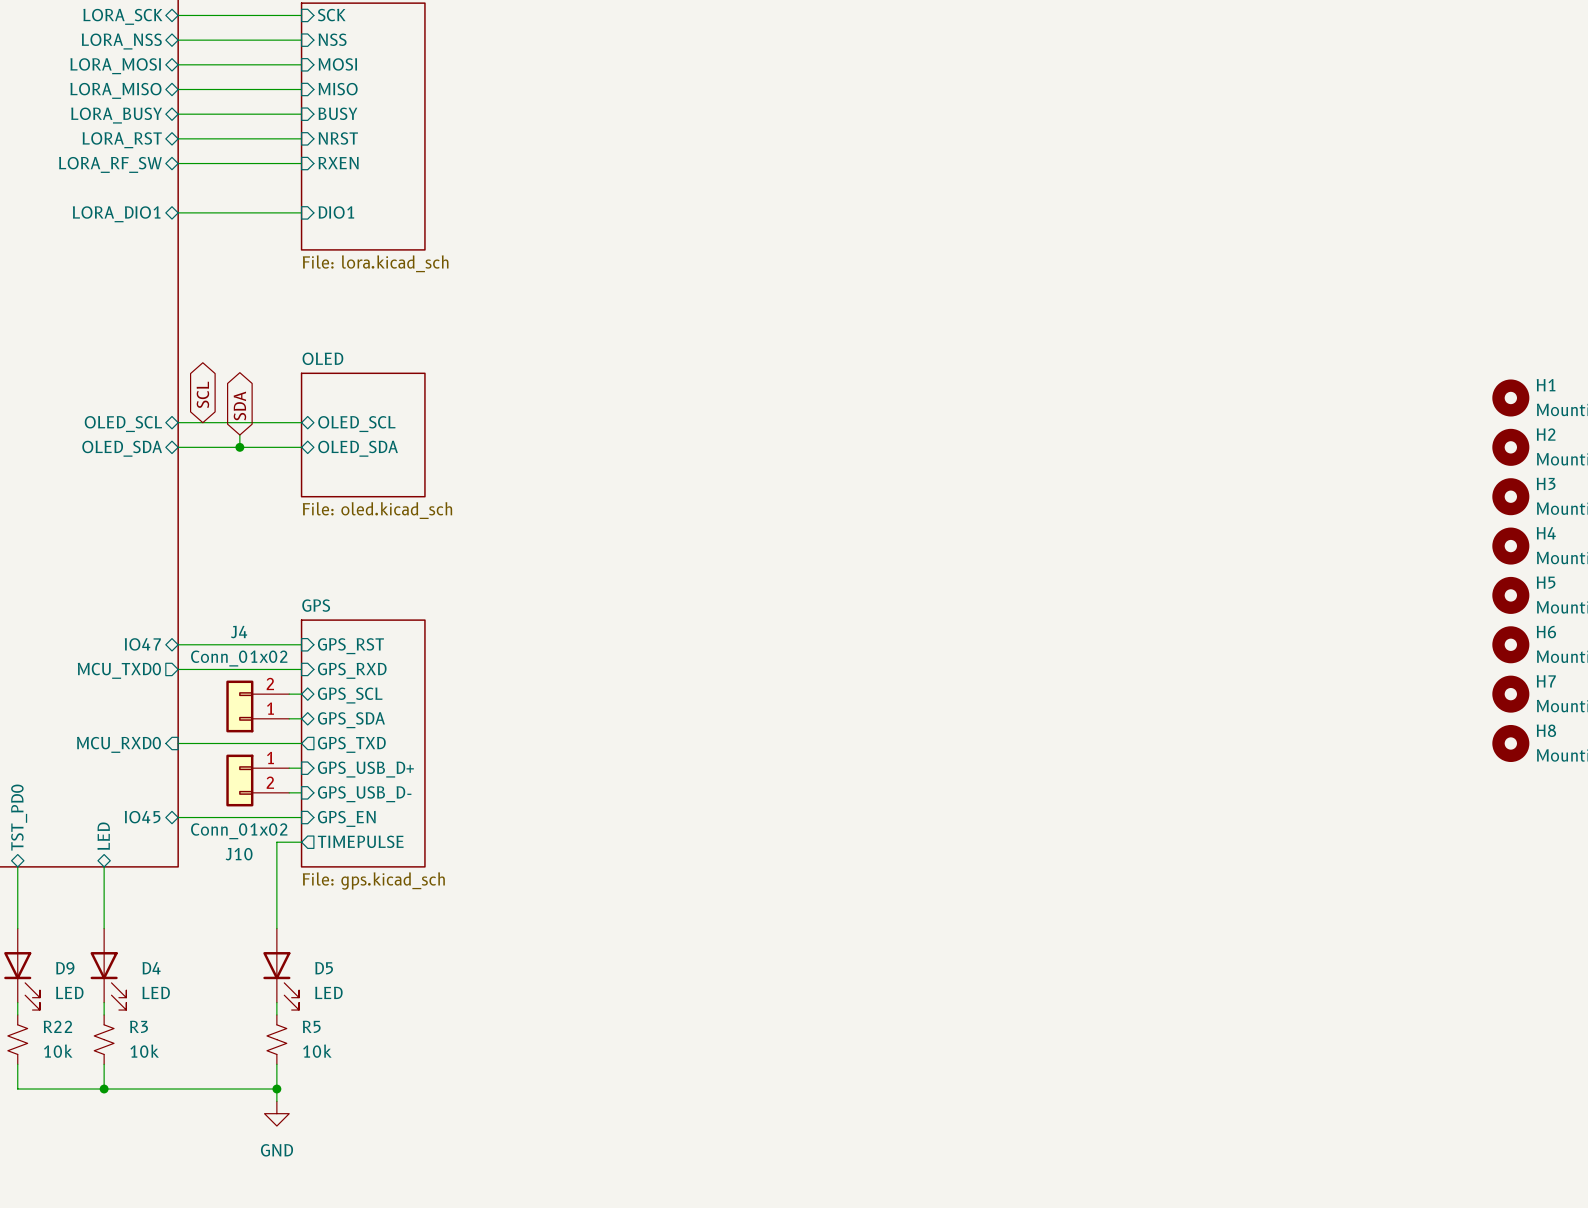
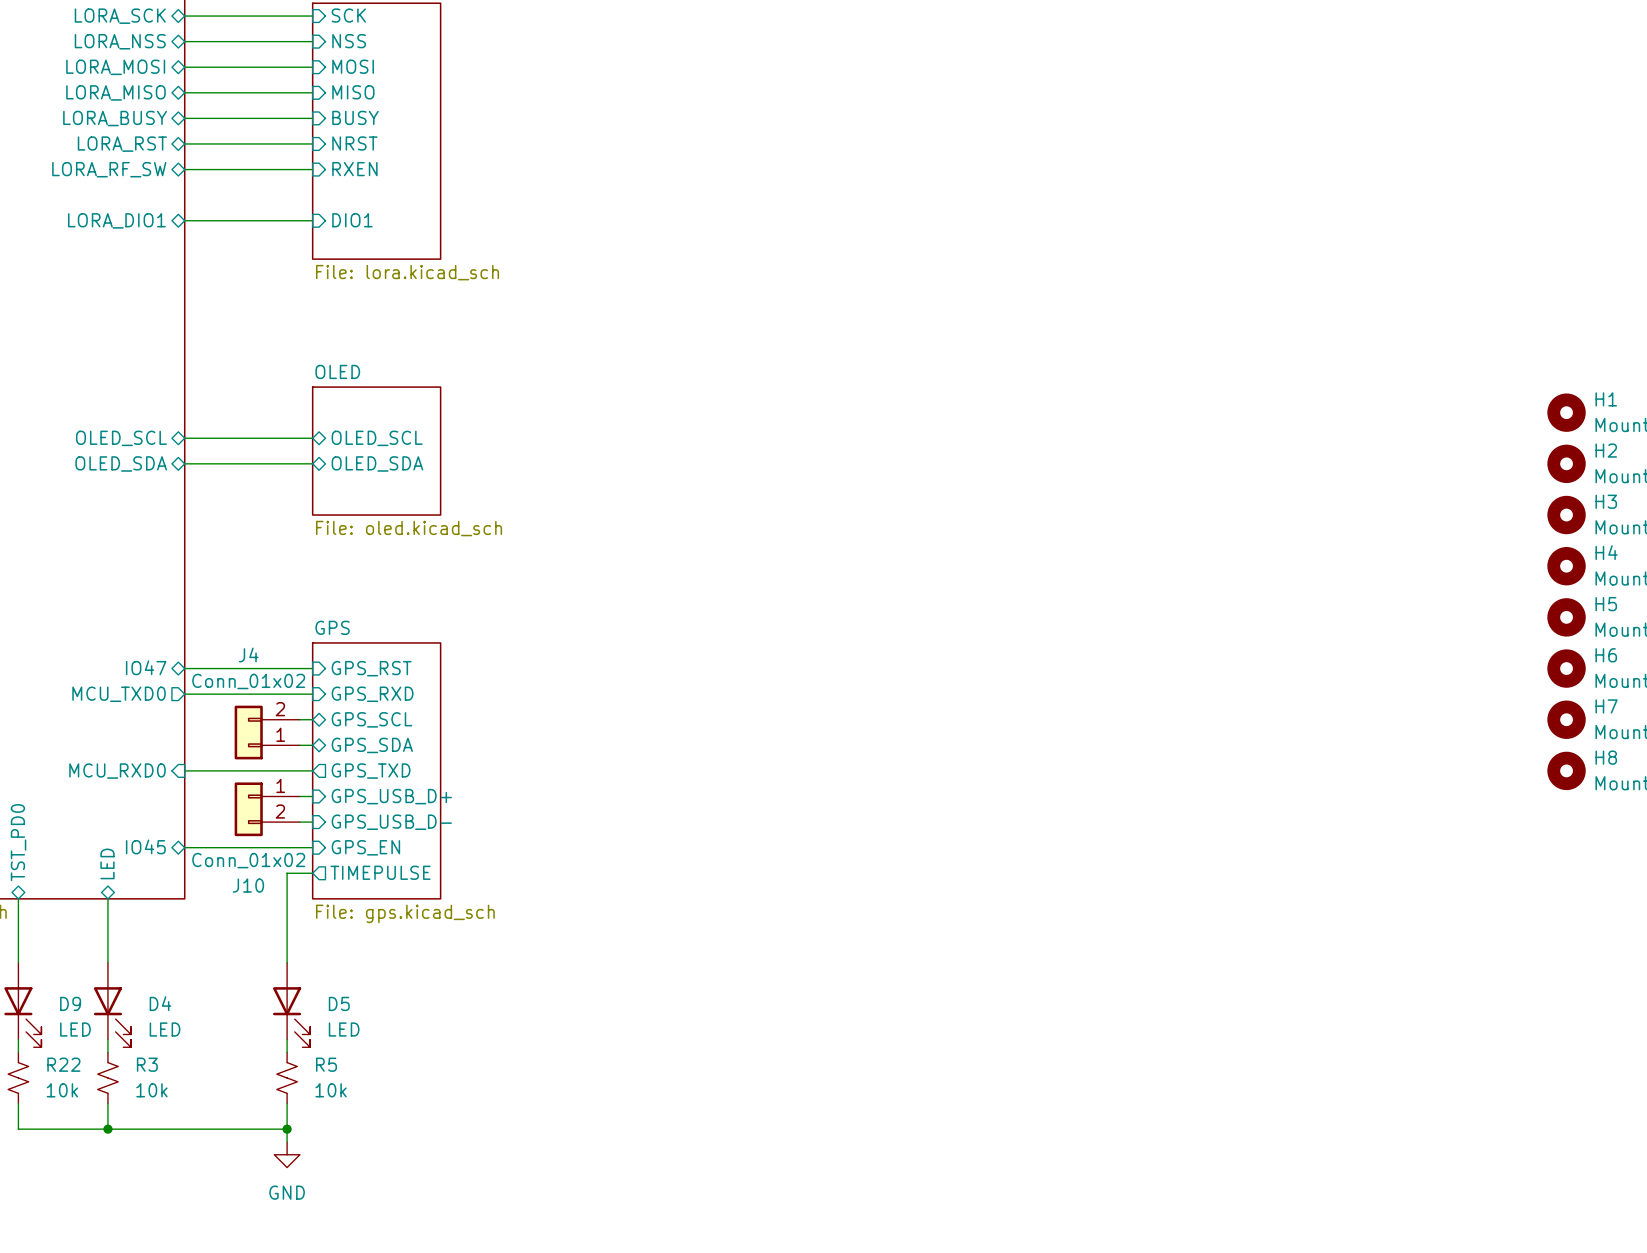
global label: SCL (202, 394) -> none
global label: SDA (239, 406) -> none
wire: (239, 435) (239, 447) -> none
junction: (239, 447) -> none

